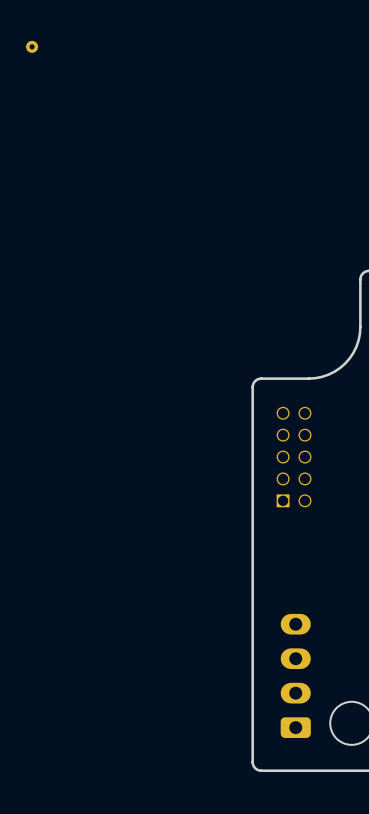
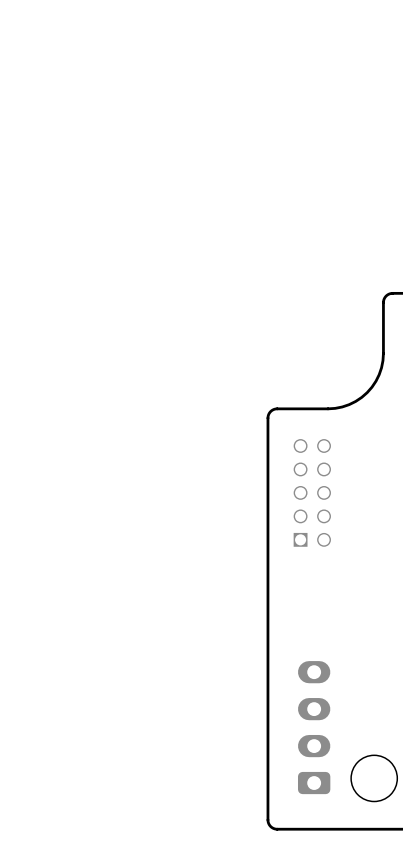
part: (32, 46) -> none

